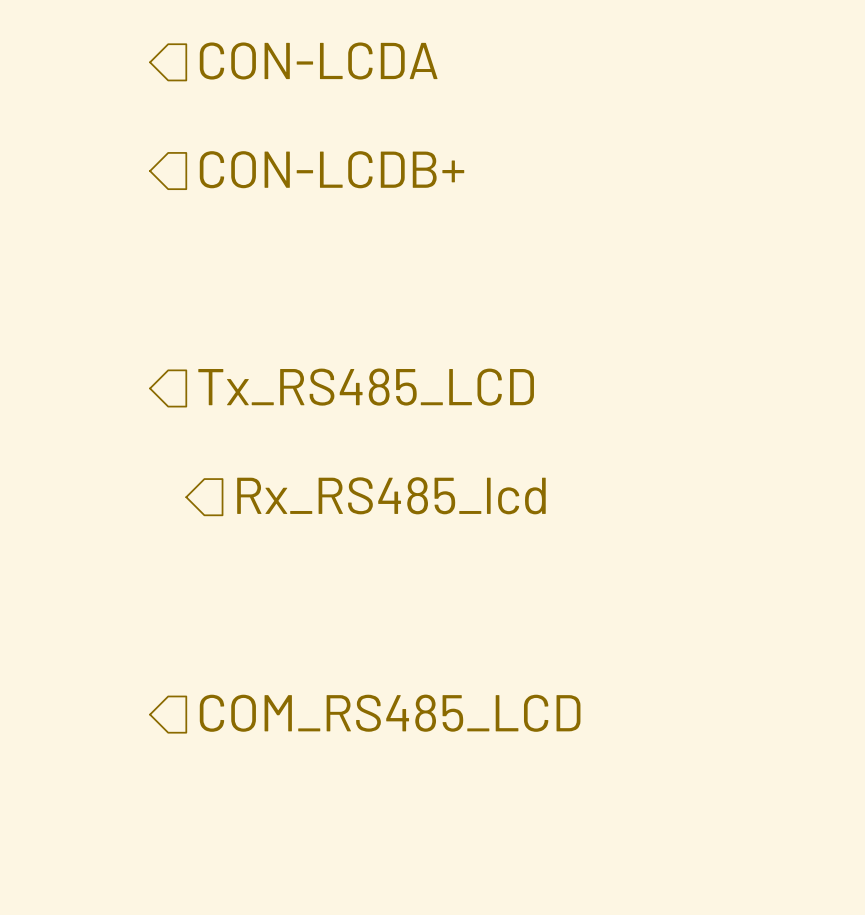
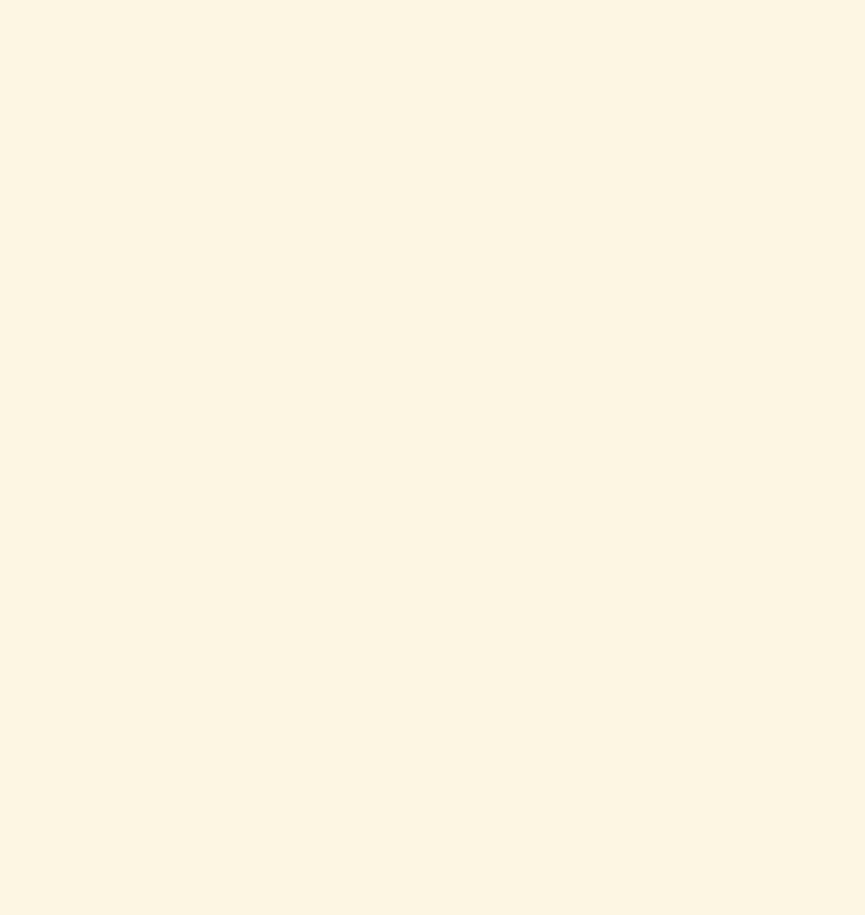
hierarchical label: CON-LCDA (318, 61) -> none
hierarchical label: CON-LCDB+ (332, 169) -> none
hierarchical label: Tx_RS485_LCD (366, 387) -> none
hierarchical label: Rx_RS485_lcd (391, 495) -> none
hierarchical label: COM_RS485_LCD (390, 713) -> none

